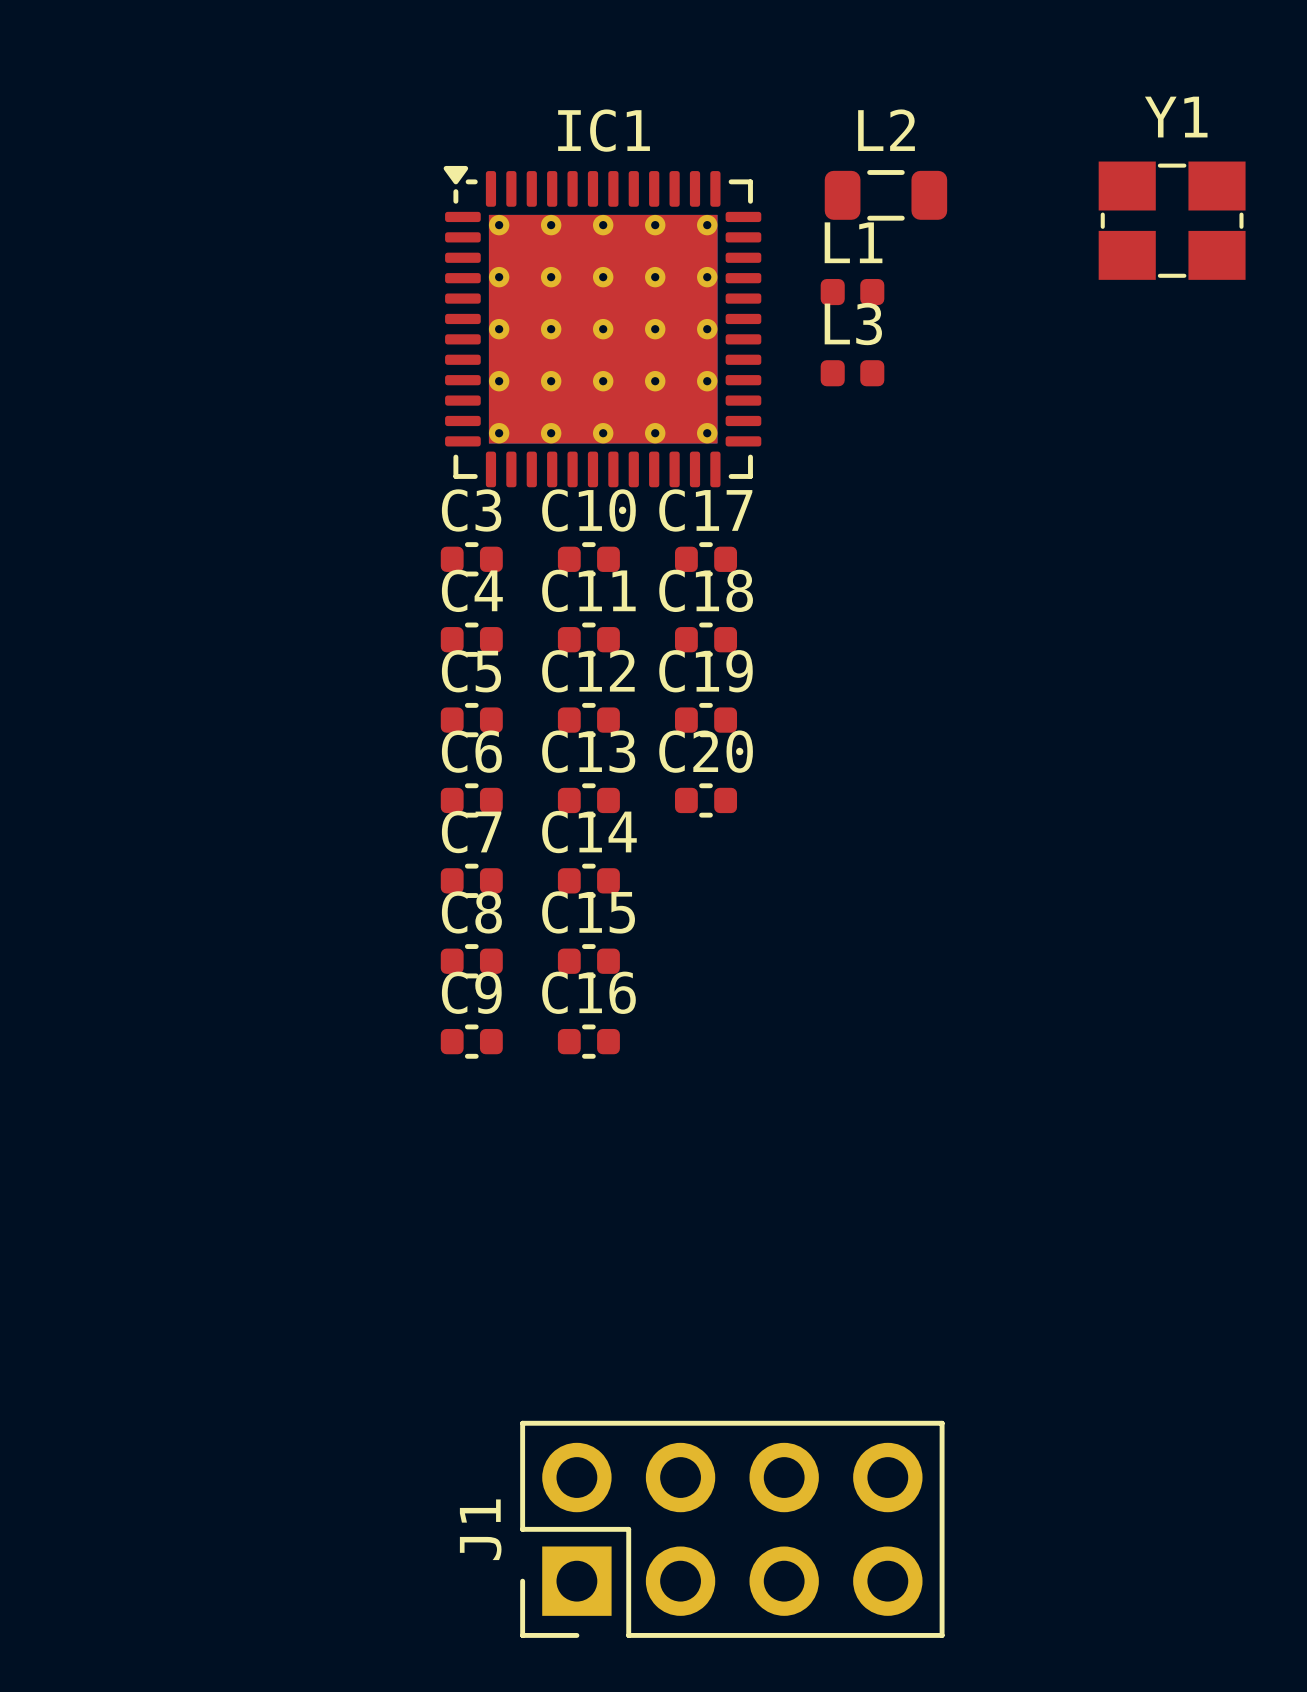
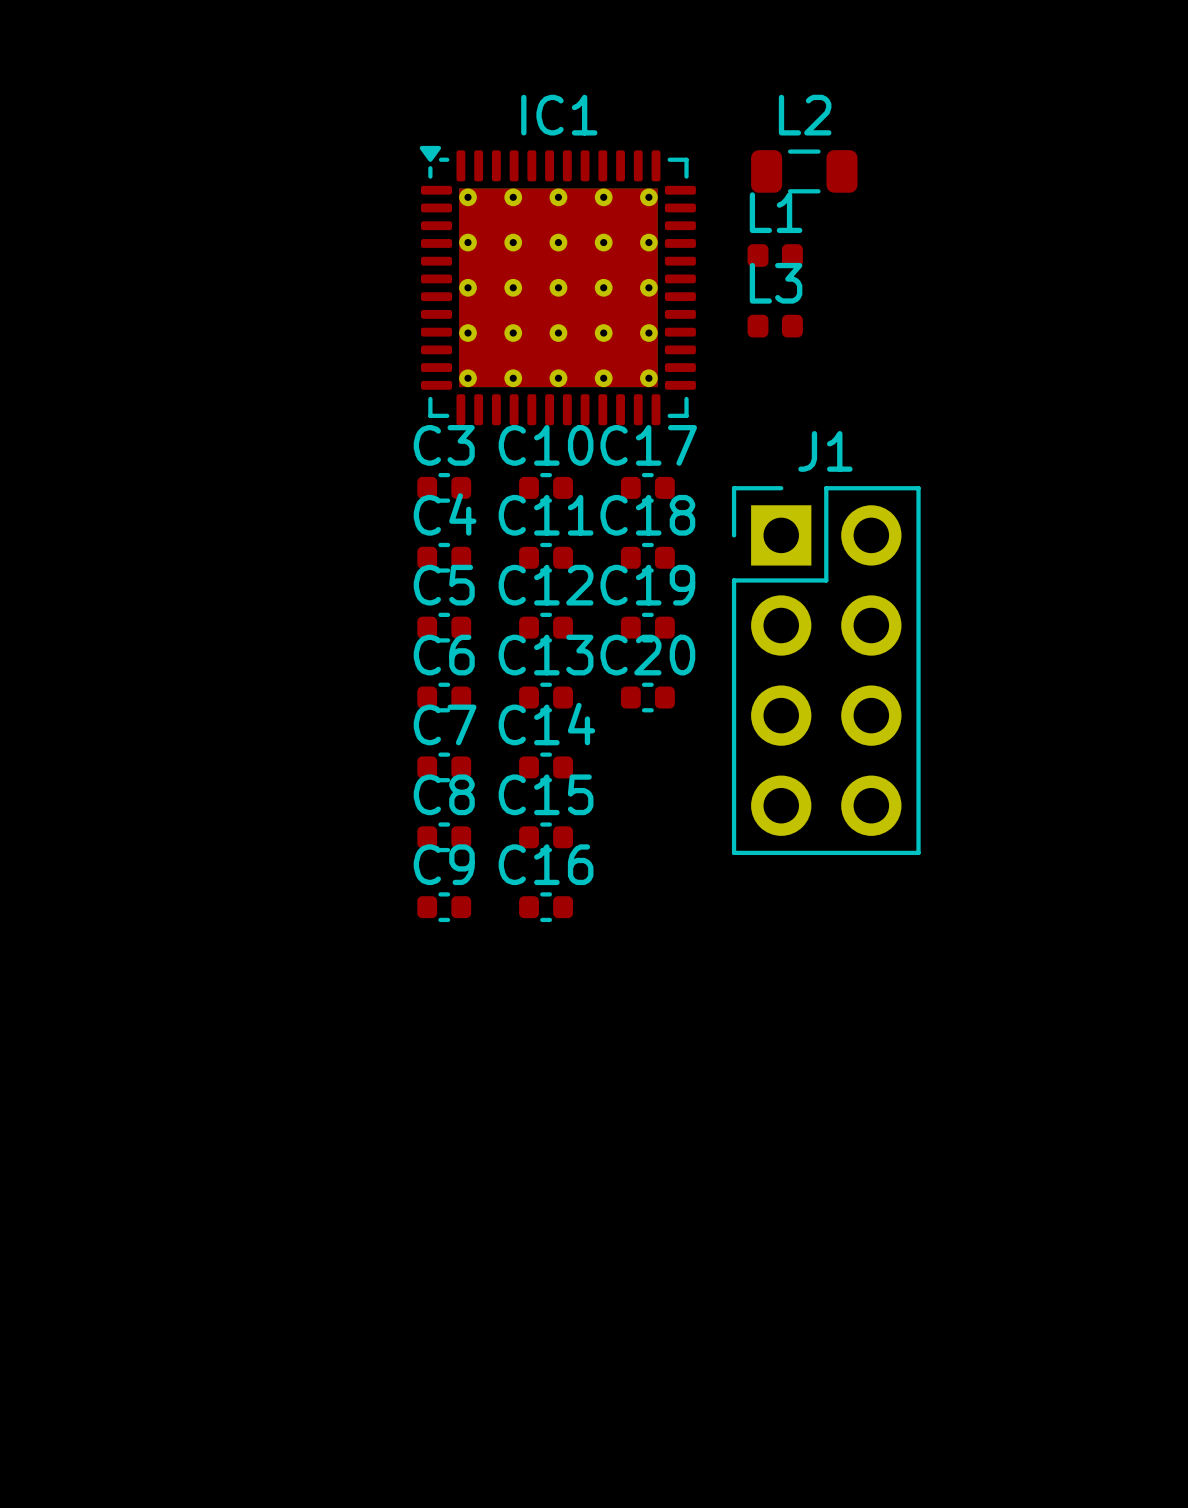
Y1: (1172, 220) -> none
J1 rotation: 0° (732, 1529) -> 90° clockwise (826, 670)
J1 position: (732, 1529) -> (826, 670)

